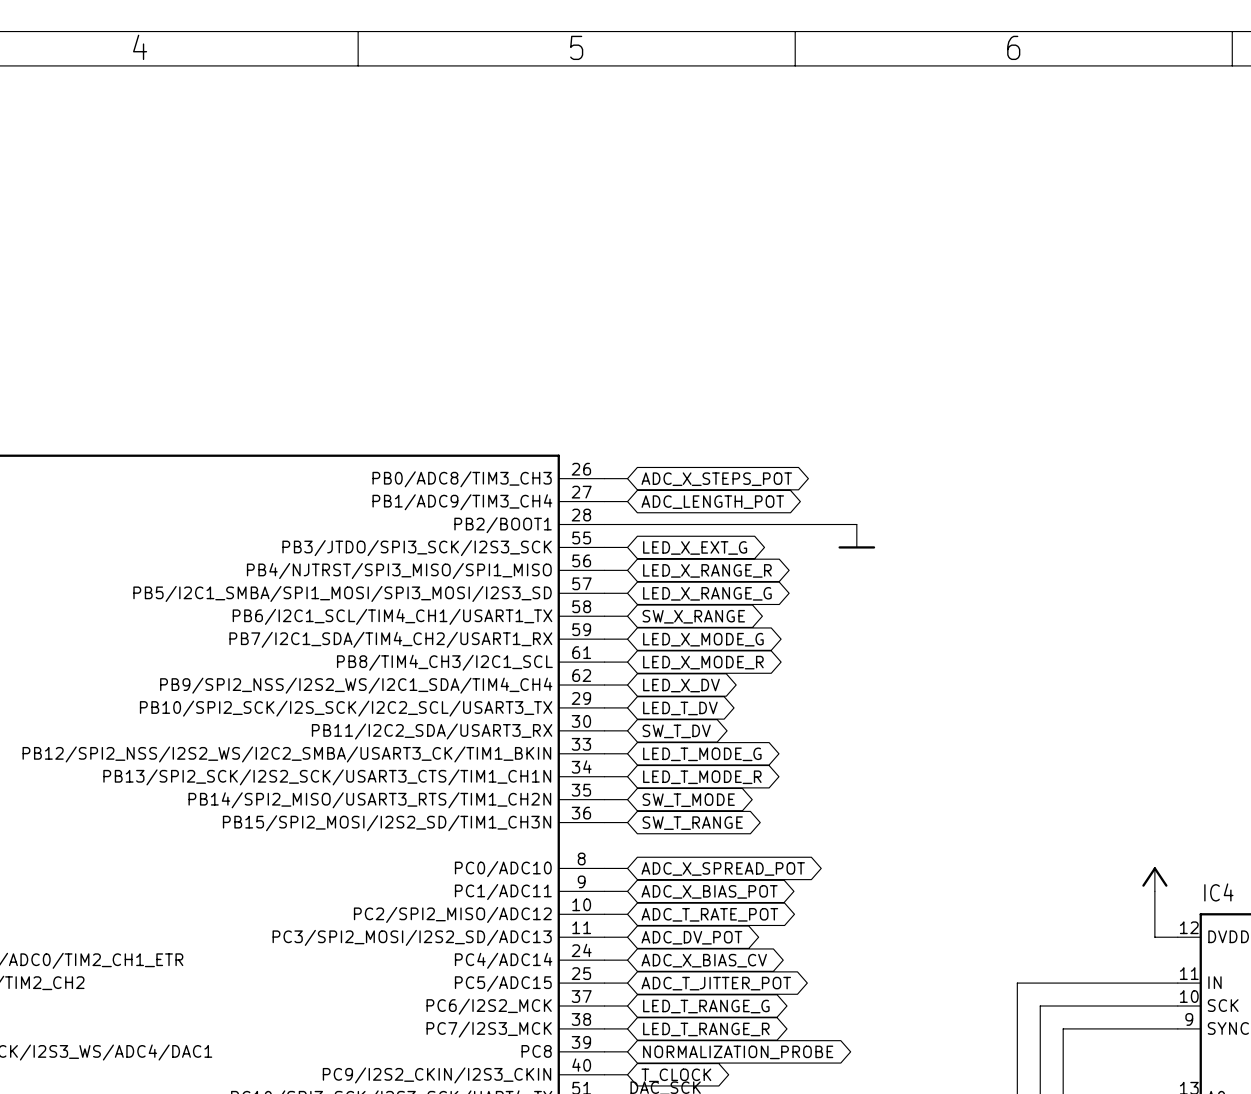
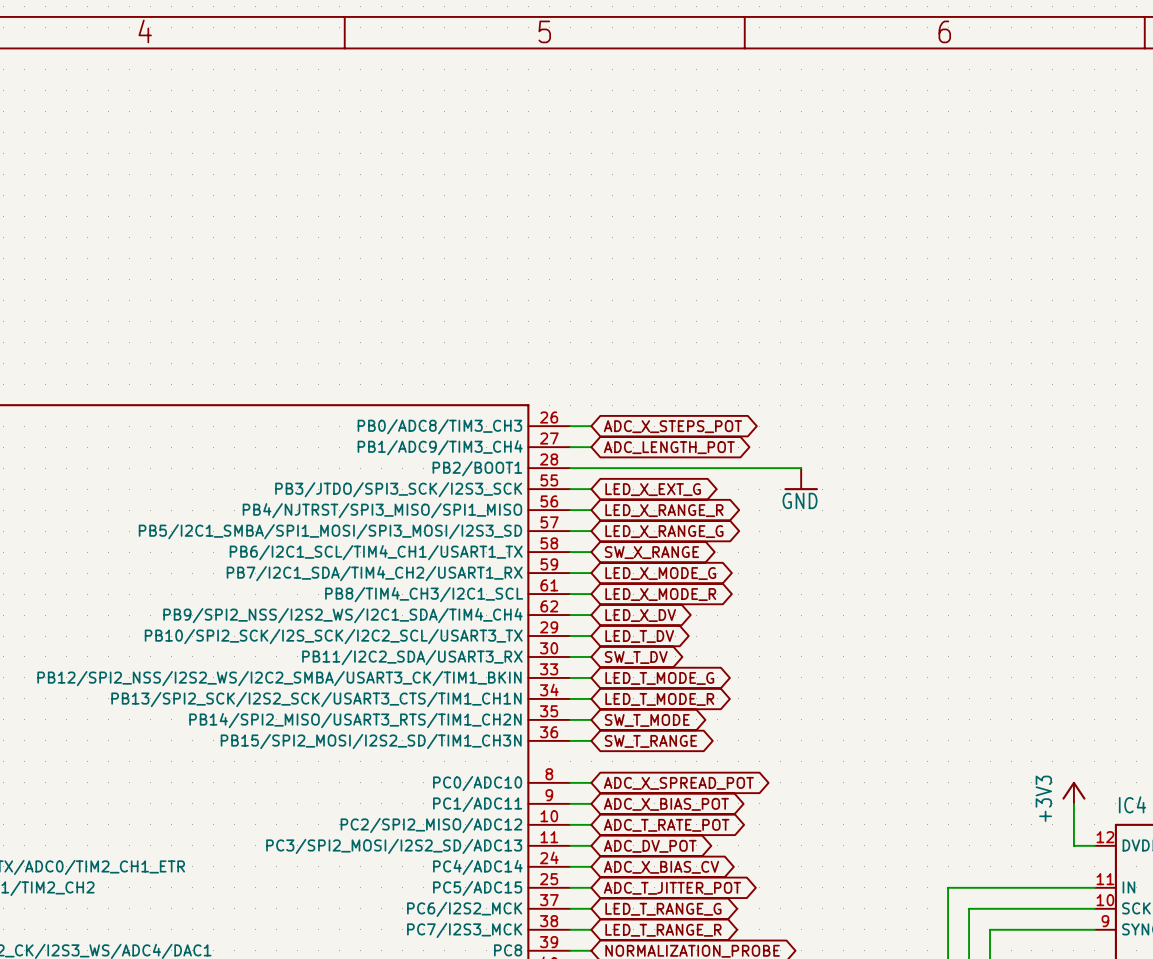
power symbol text: none -> GND (800, 500)
power symbol text: none -> +3V3 (1043, 798)

